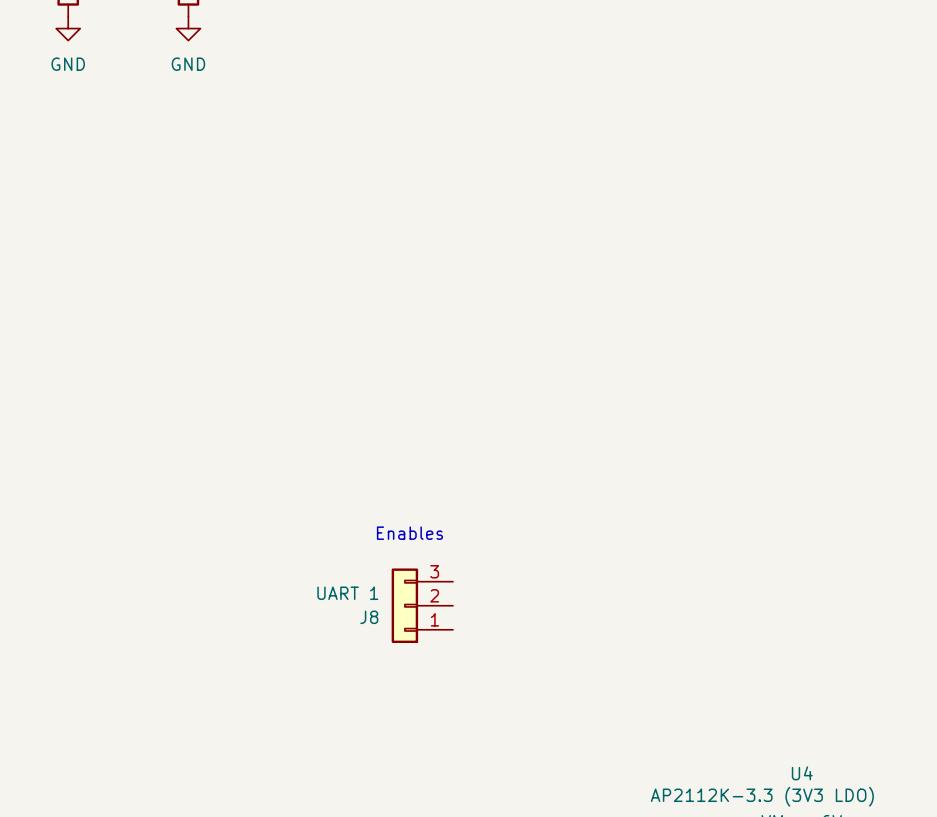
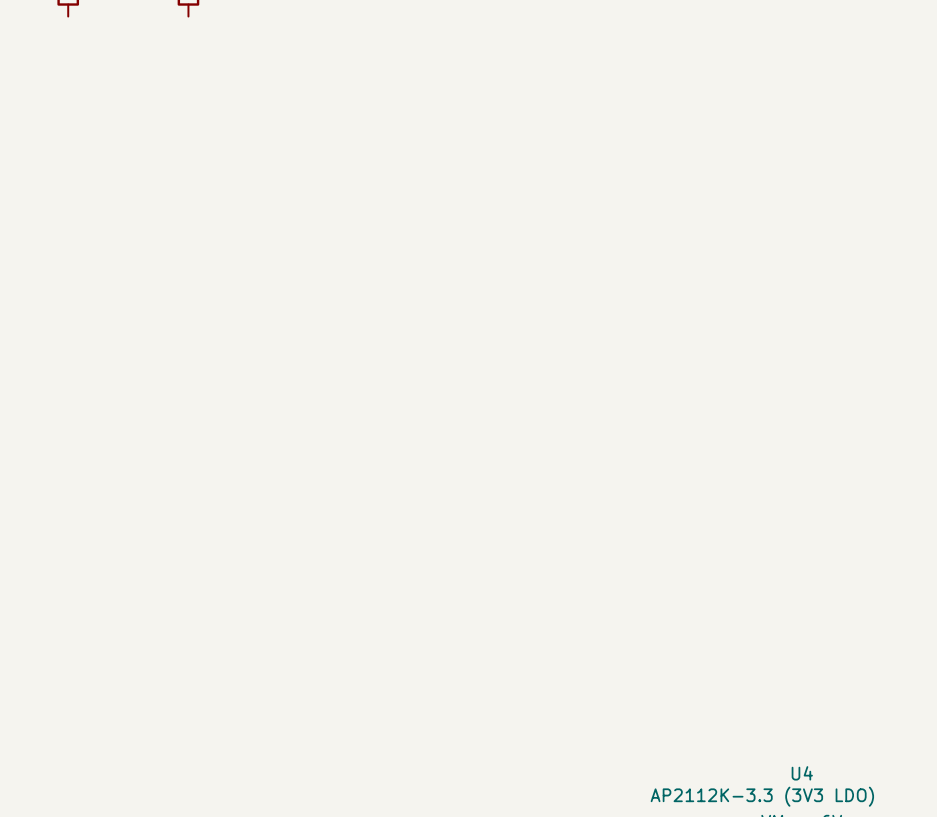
power symbol: GND (68, 28) -> none
power symbol: GND (188, 28) -> none
text: Enables (409, 533) -> none
J8: UART 1 (422, 605) -> none

